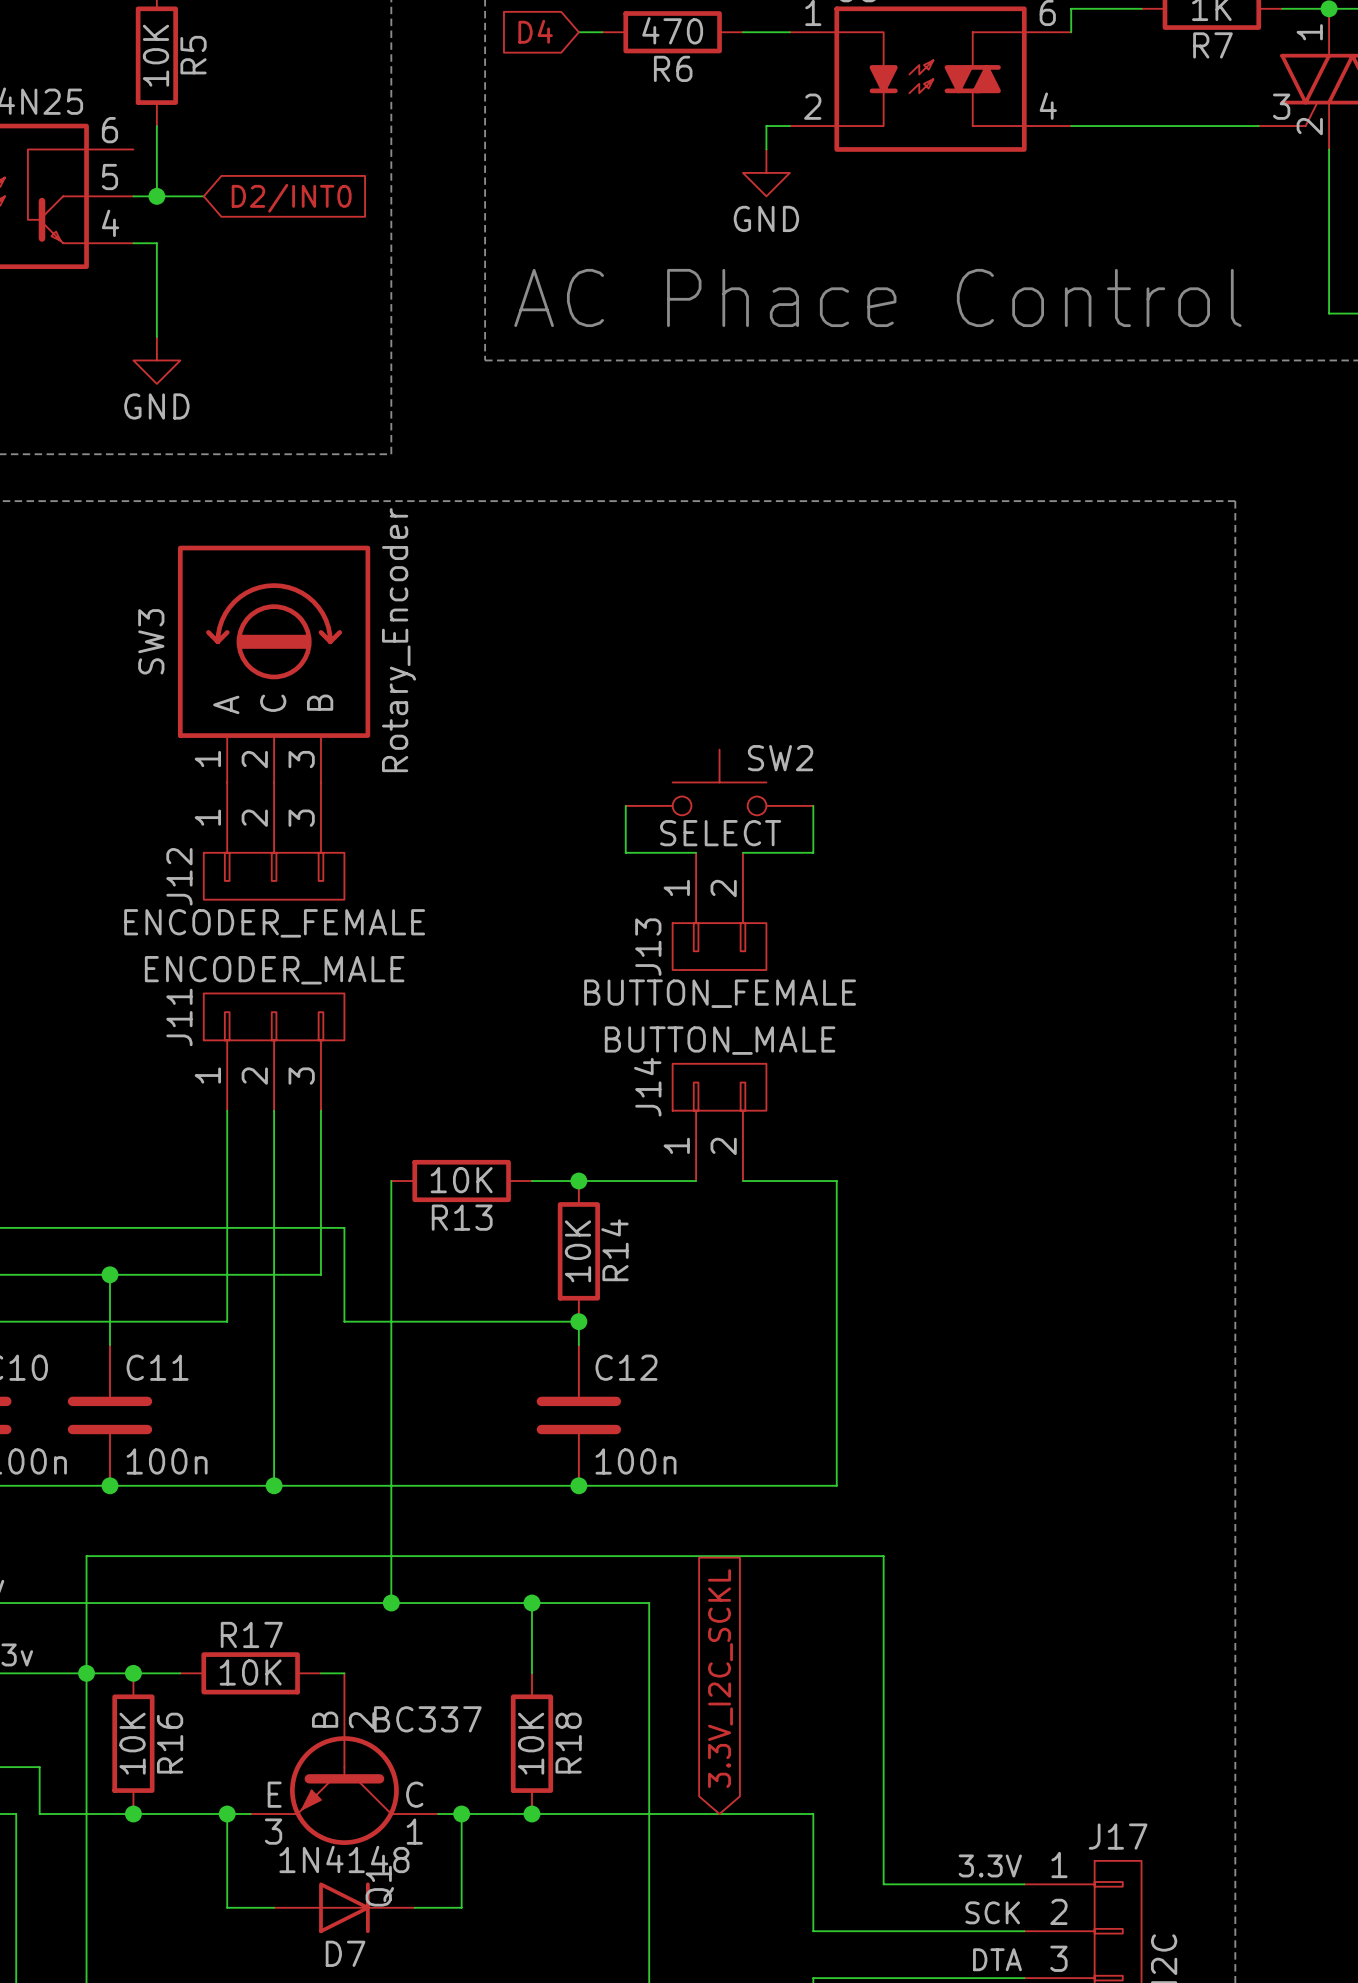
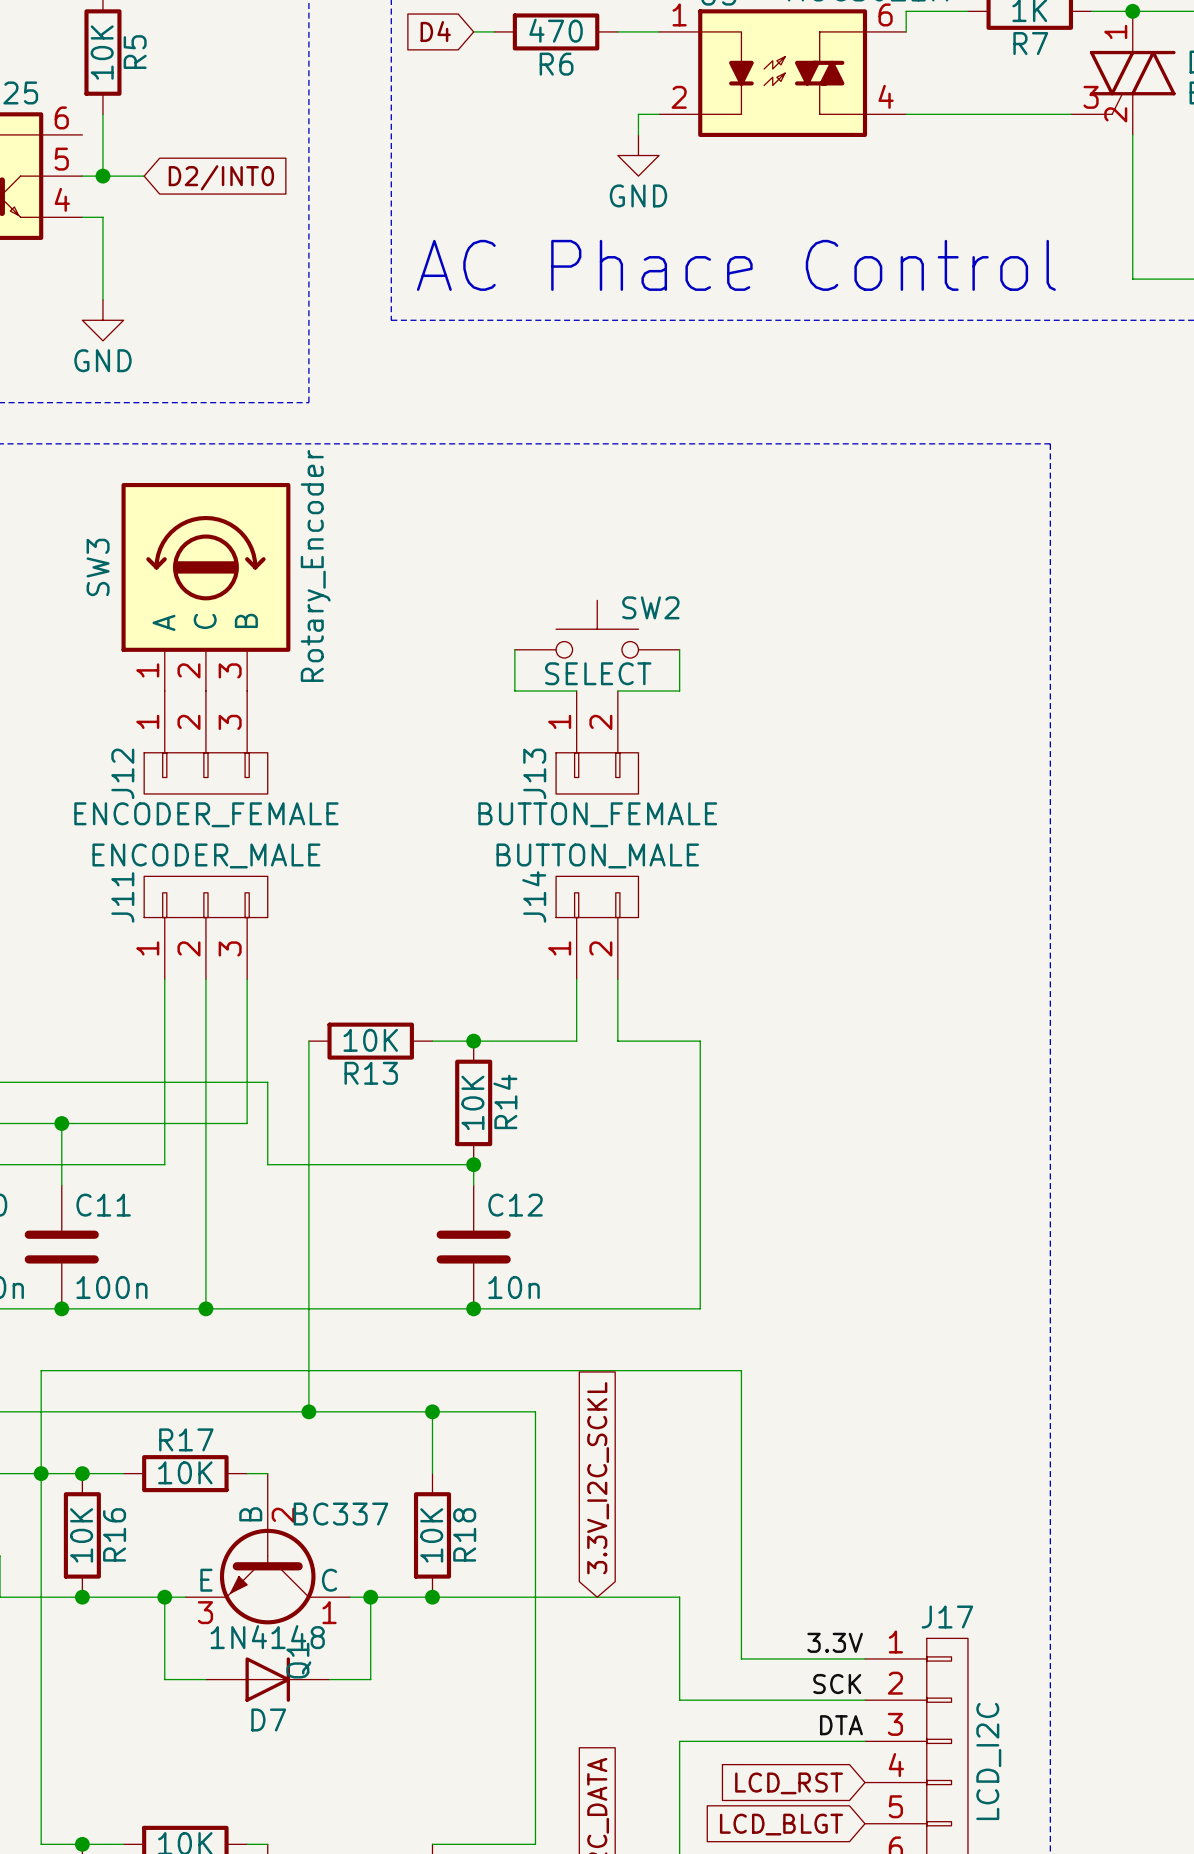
SW2 position: (719, 782) -> (597, 629)
wire: (625, 805) (625, 852) (696, 852) -> (514, 649) (514, 691) (576, 691)
wire: (813, 805) (813, 852) (742, 852) -> (679, 649) (679, 691) (617, 691)
J13 position: (719, 911) -> (597, 742)
J14 position: (719, 1122) -> (597, 927)
C12 value: 100n (635, 1461) -> 10n (514, 1287)

